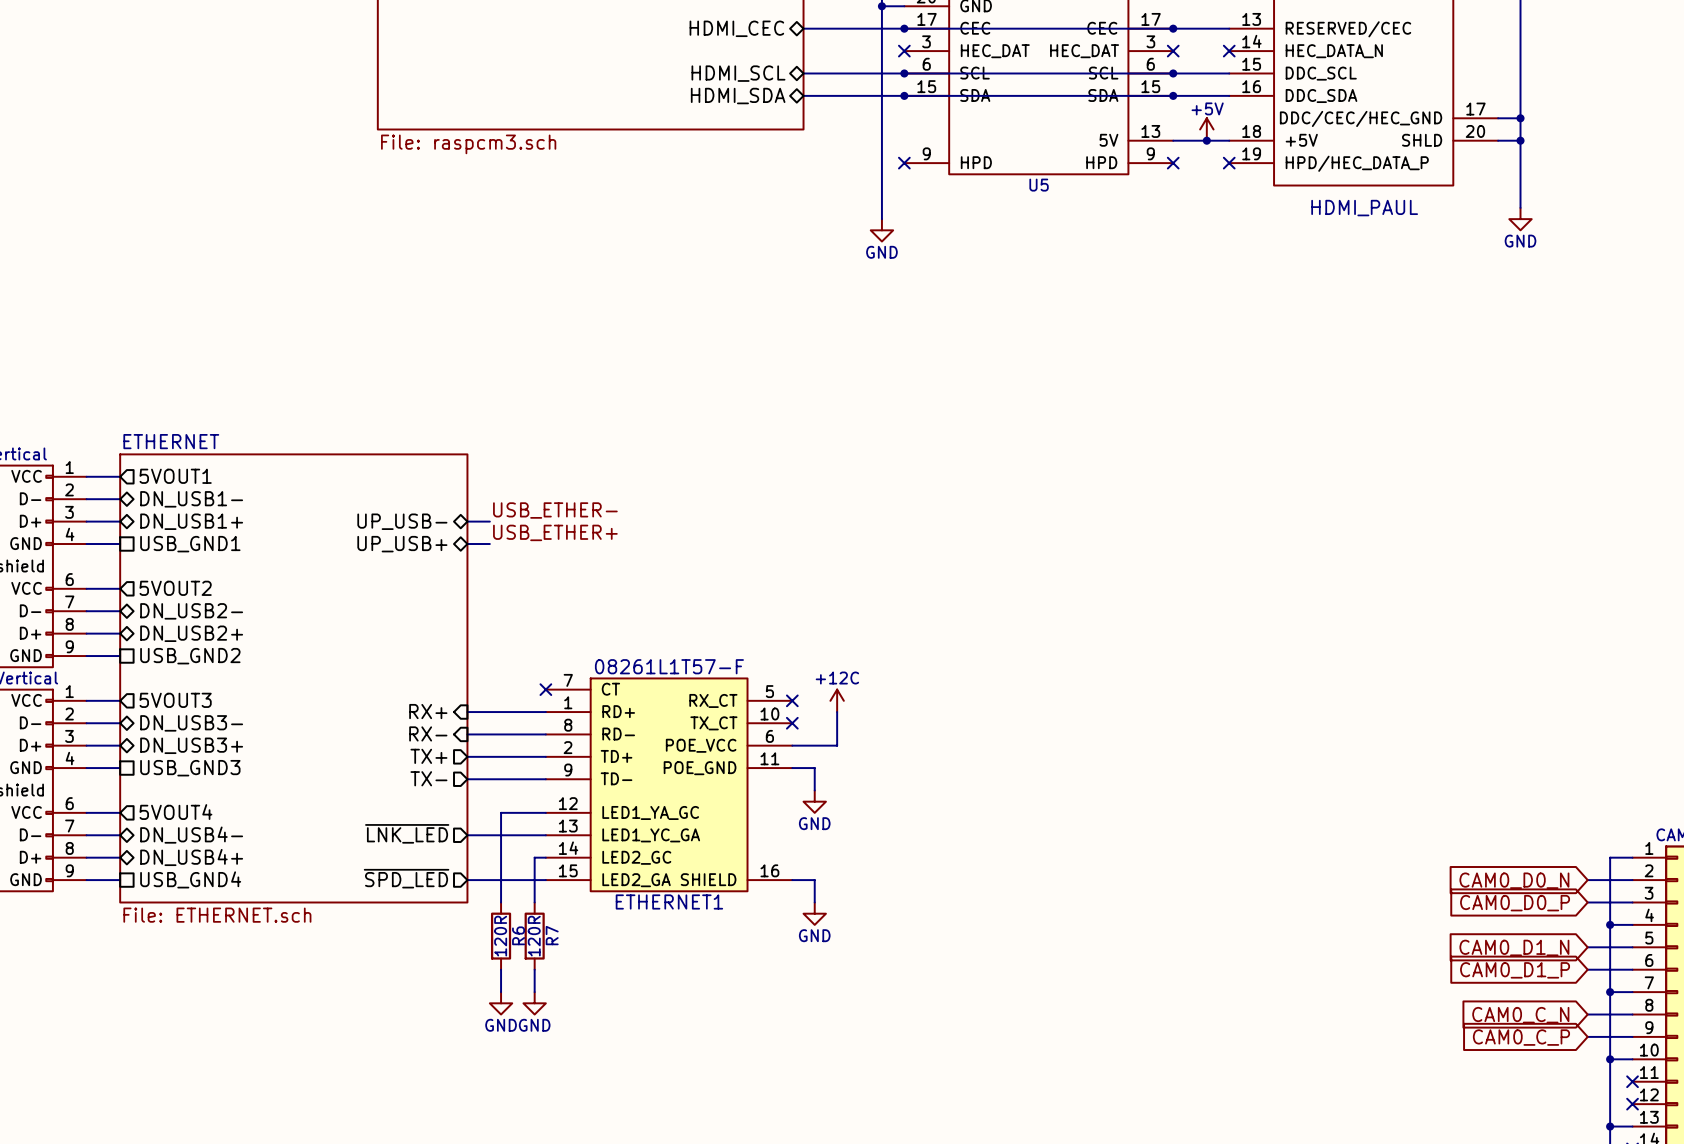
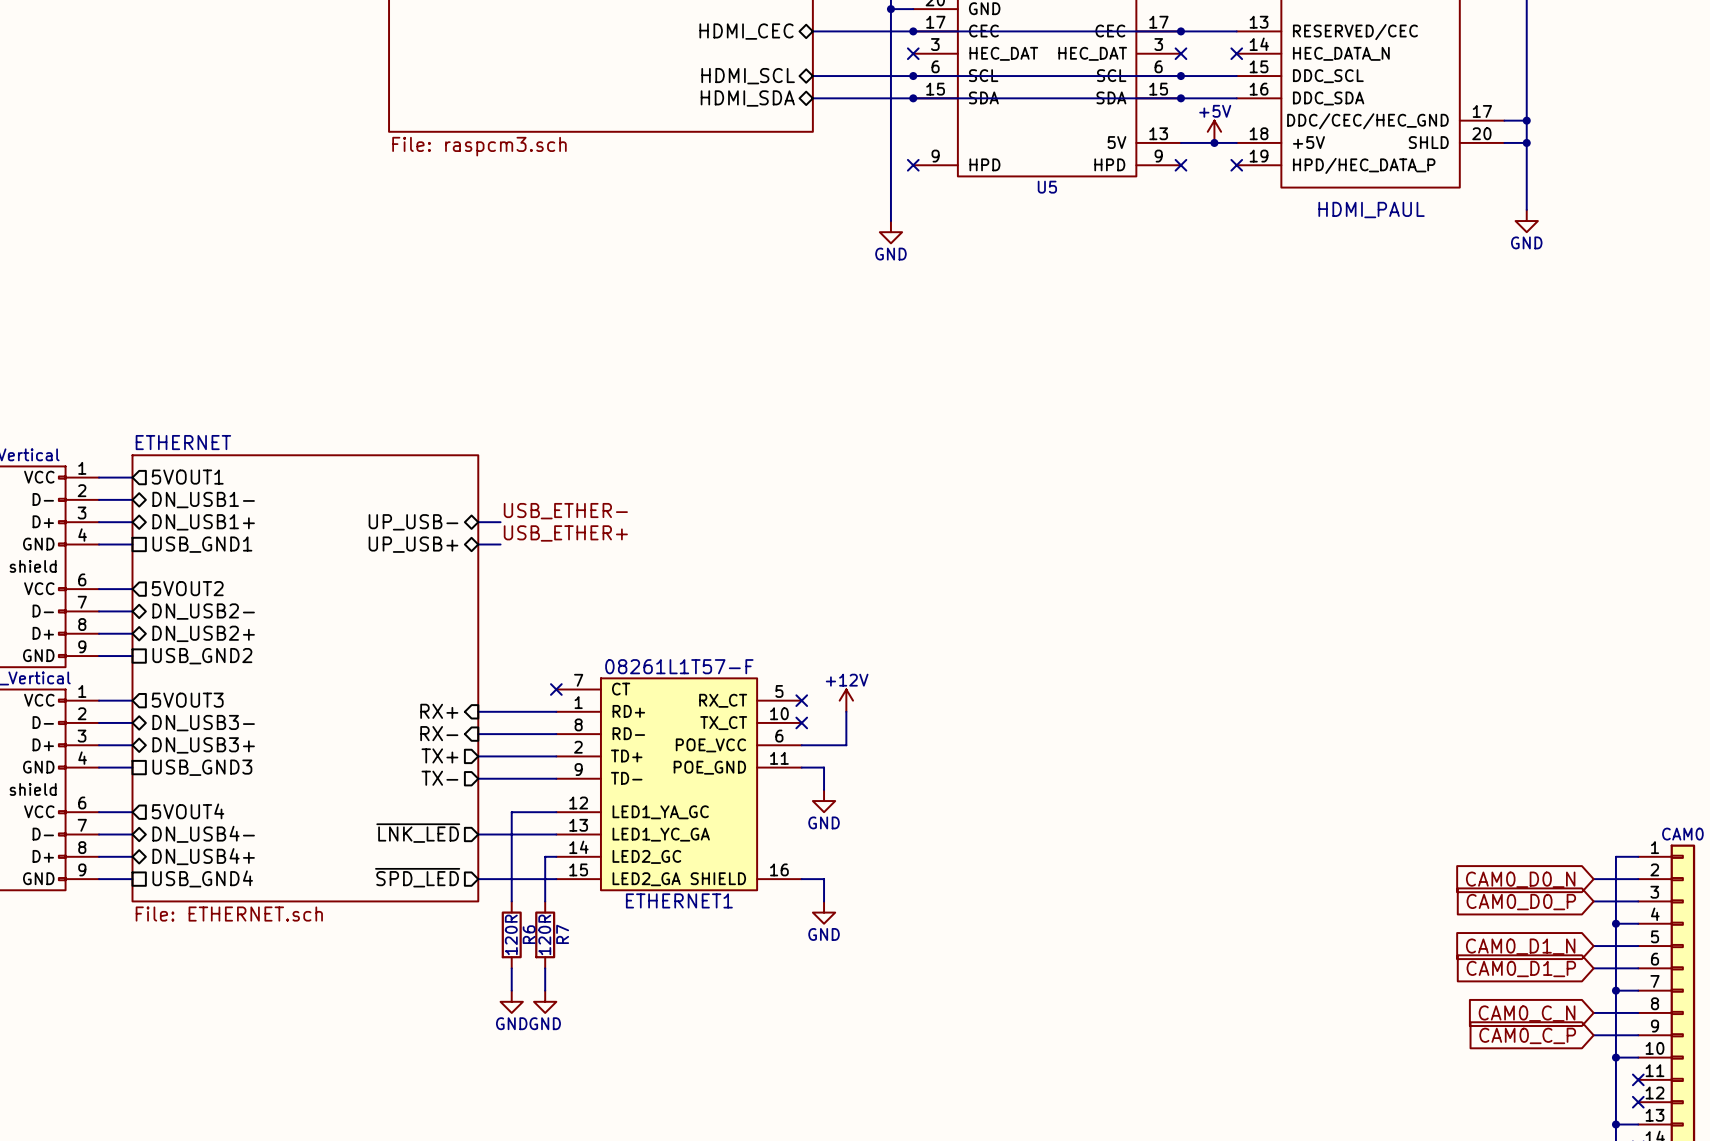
power symbol: +12C (837, 700) -> +12V (846, 700)

